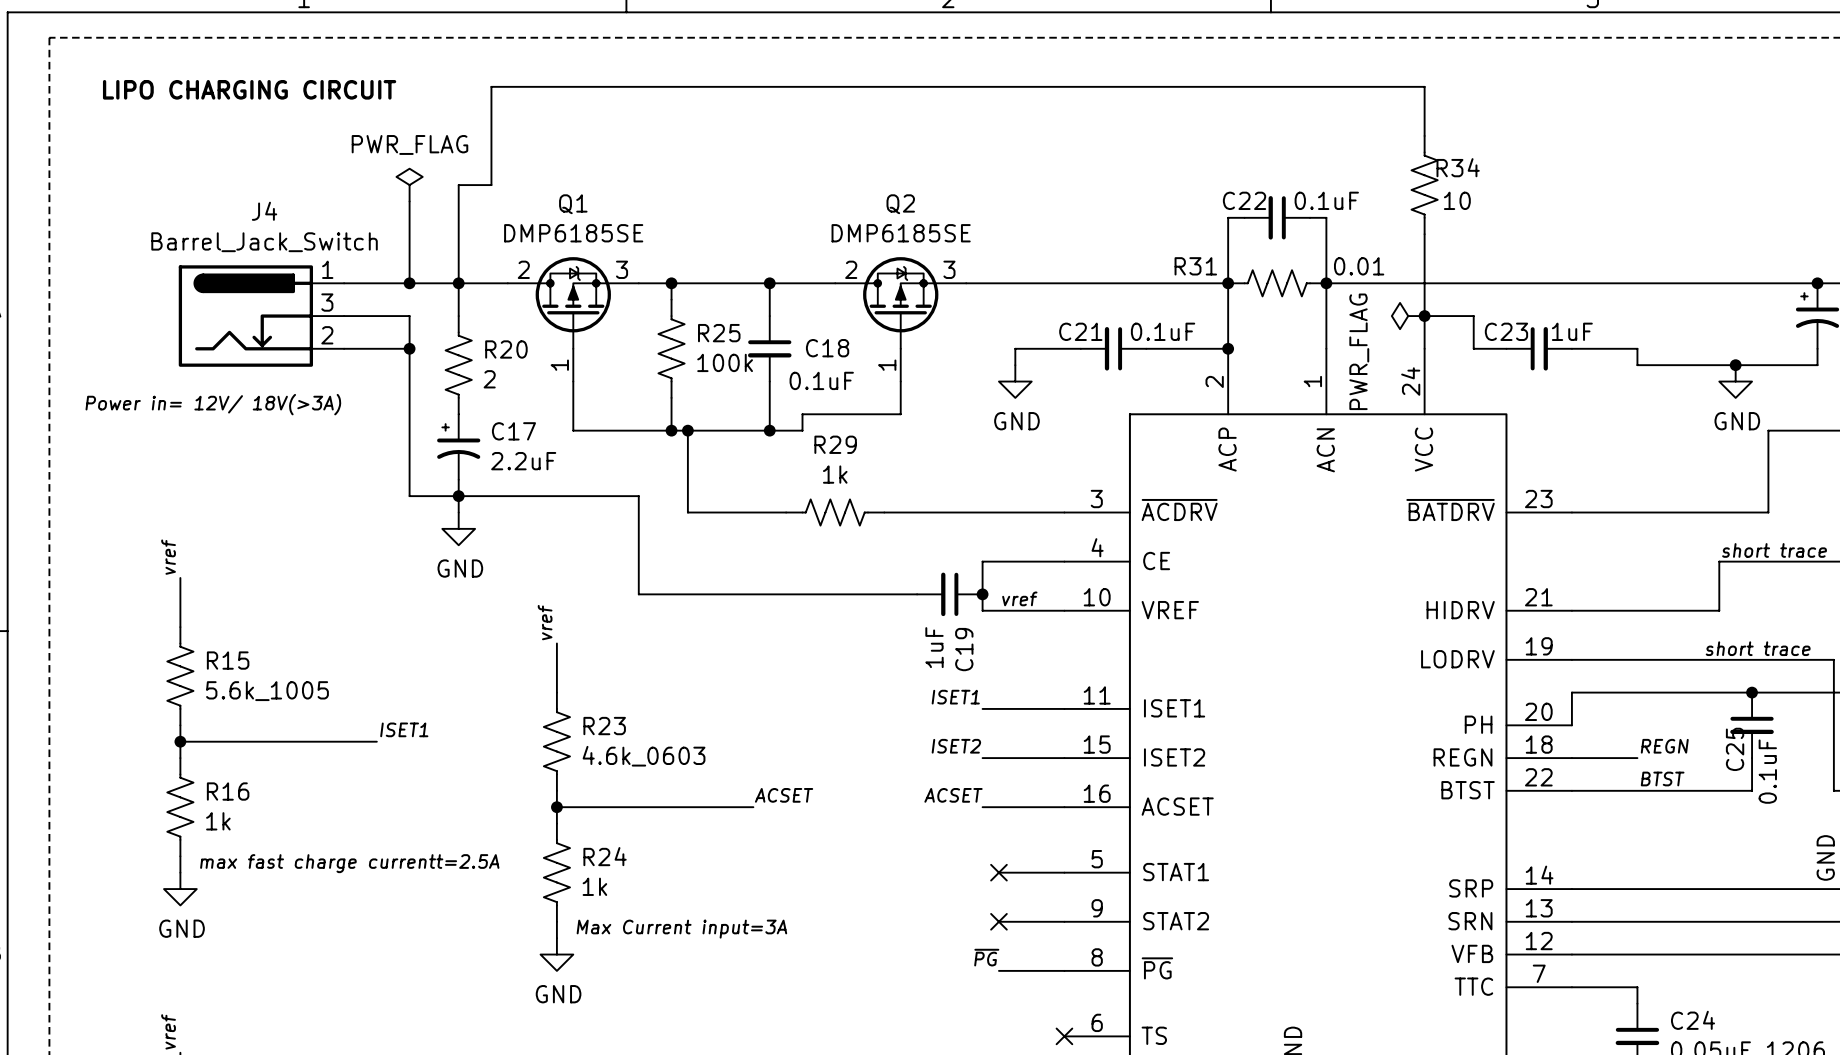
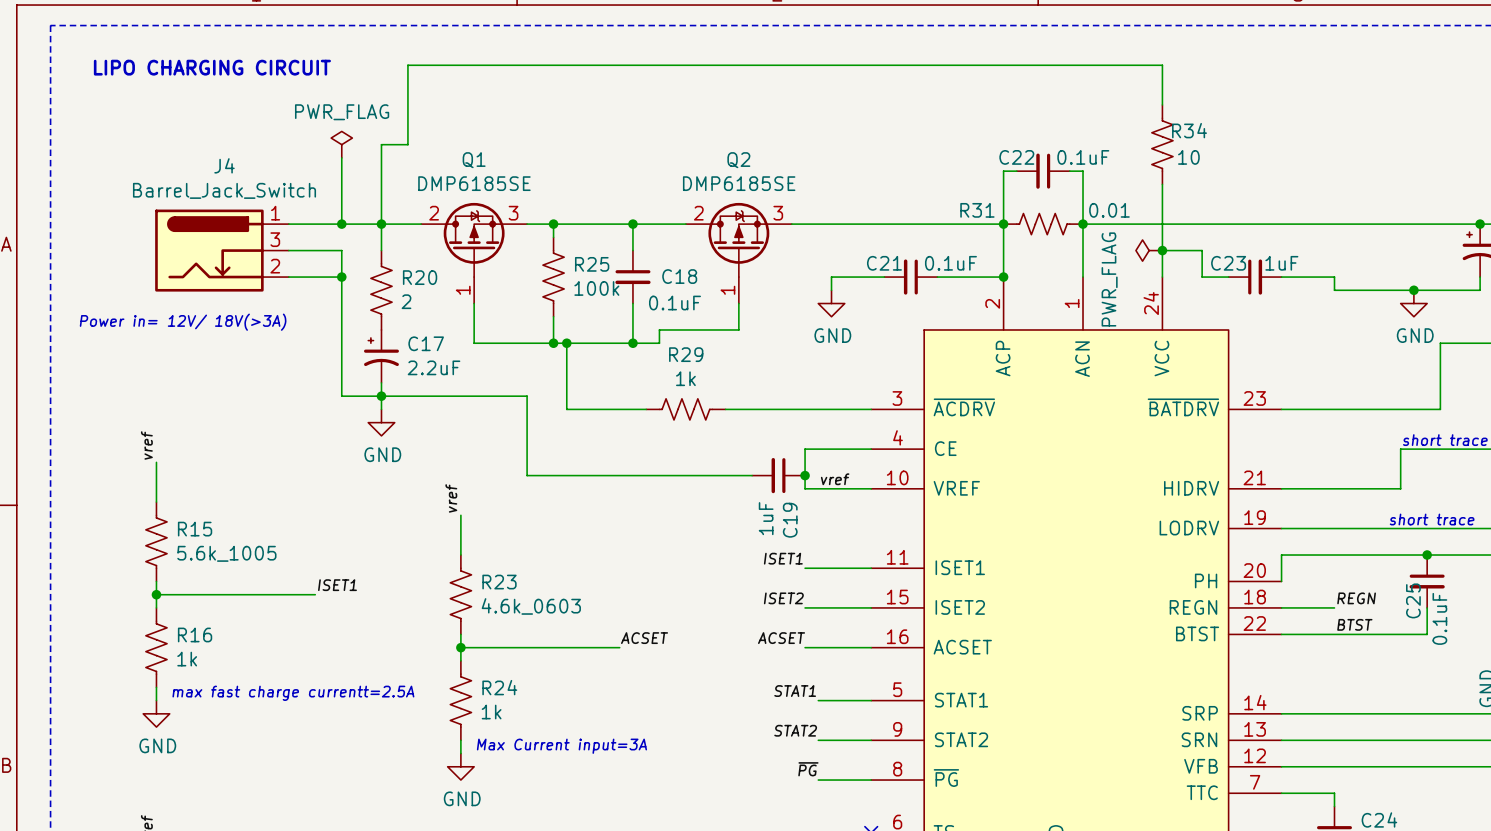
label: none -> STAT1 (795, 691)
no-connect mark: (998, 872) -> none
label: none -> STAT2 (795, 730)
no-connect mark: (998, 921) -> none

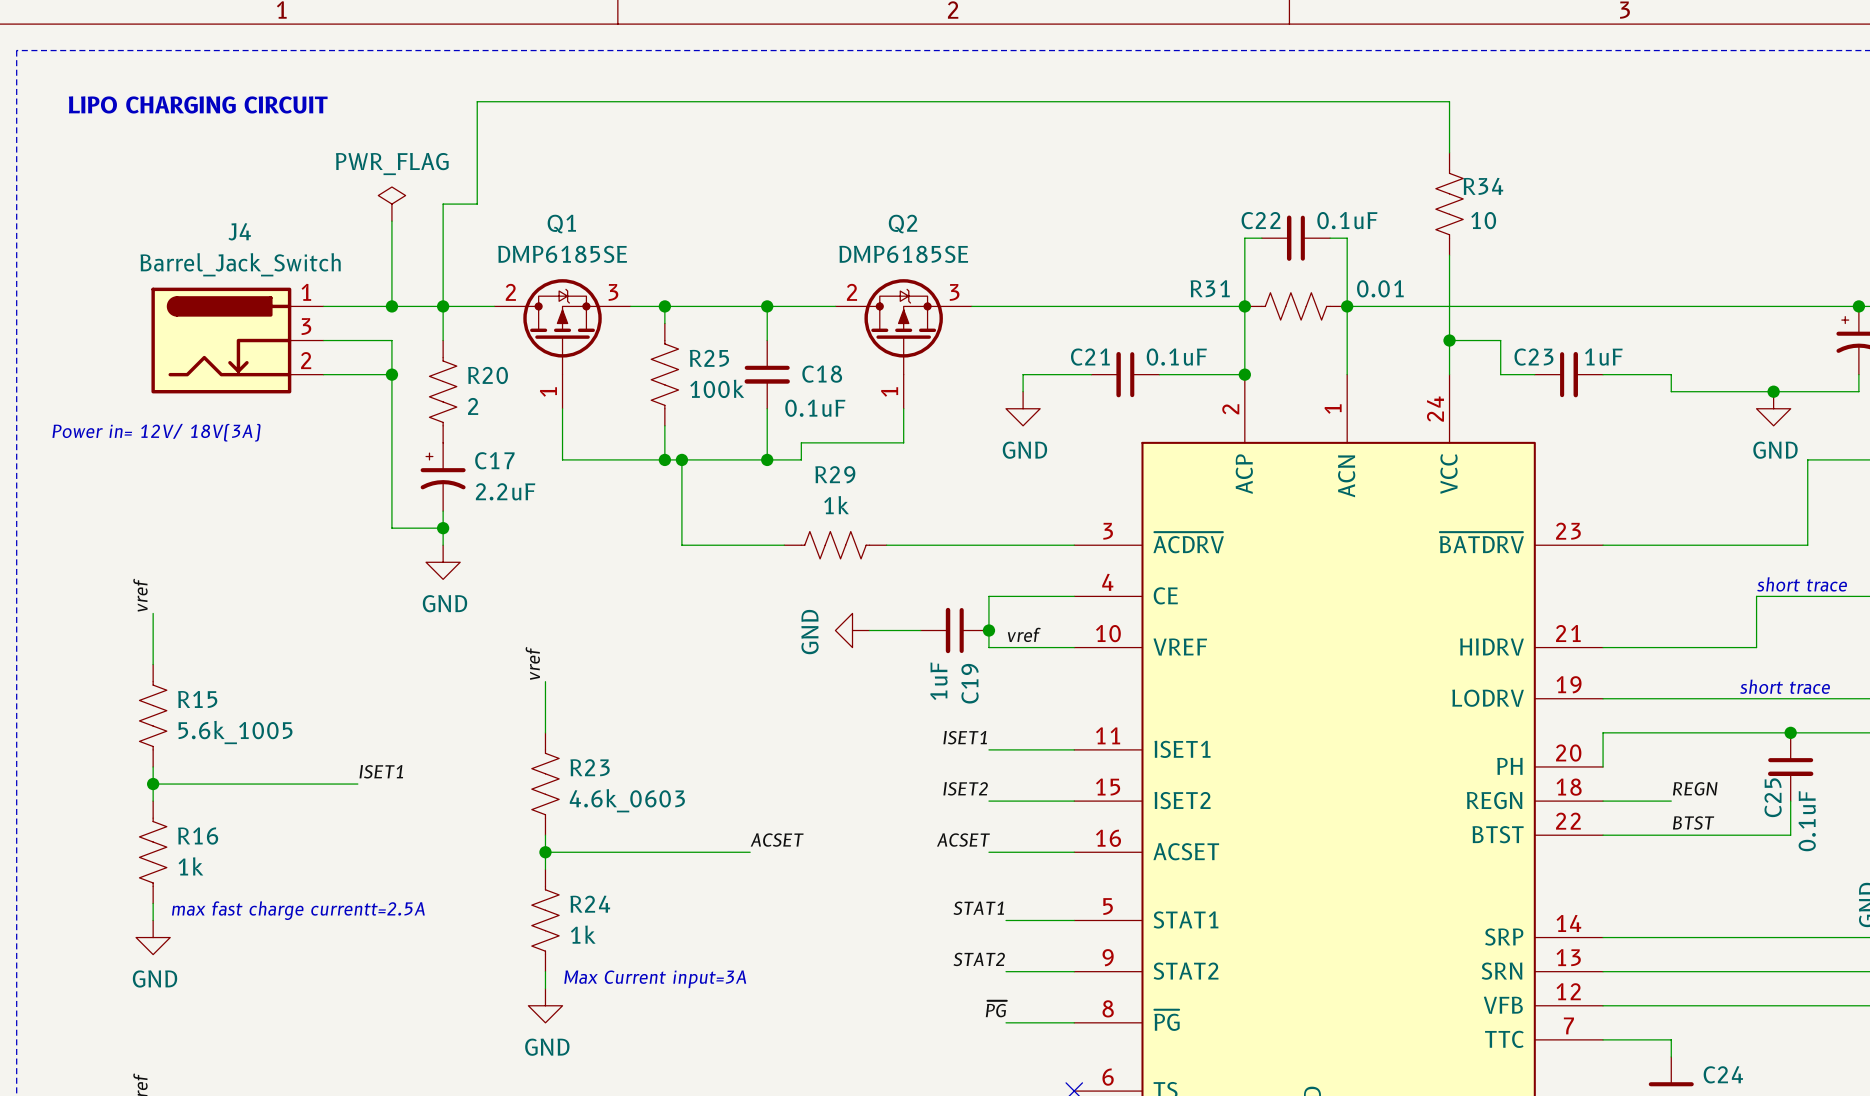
power symbol: PWR_FLAG (1149, 250) -> none
text: Power in= 12V/ 18V(>3A) (183, 322) -> Power in= 12V/ 18V(3A) (156, 432)
wire: (381, 396) (527, 396) (527, 475) (712, 475) -> none
power symbol: none -> GND (852, 630)

